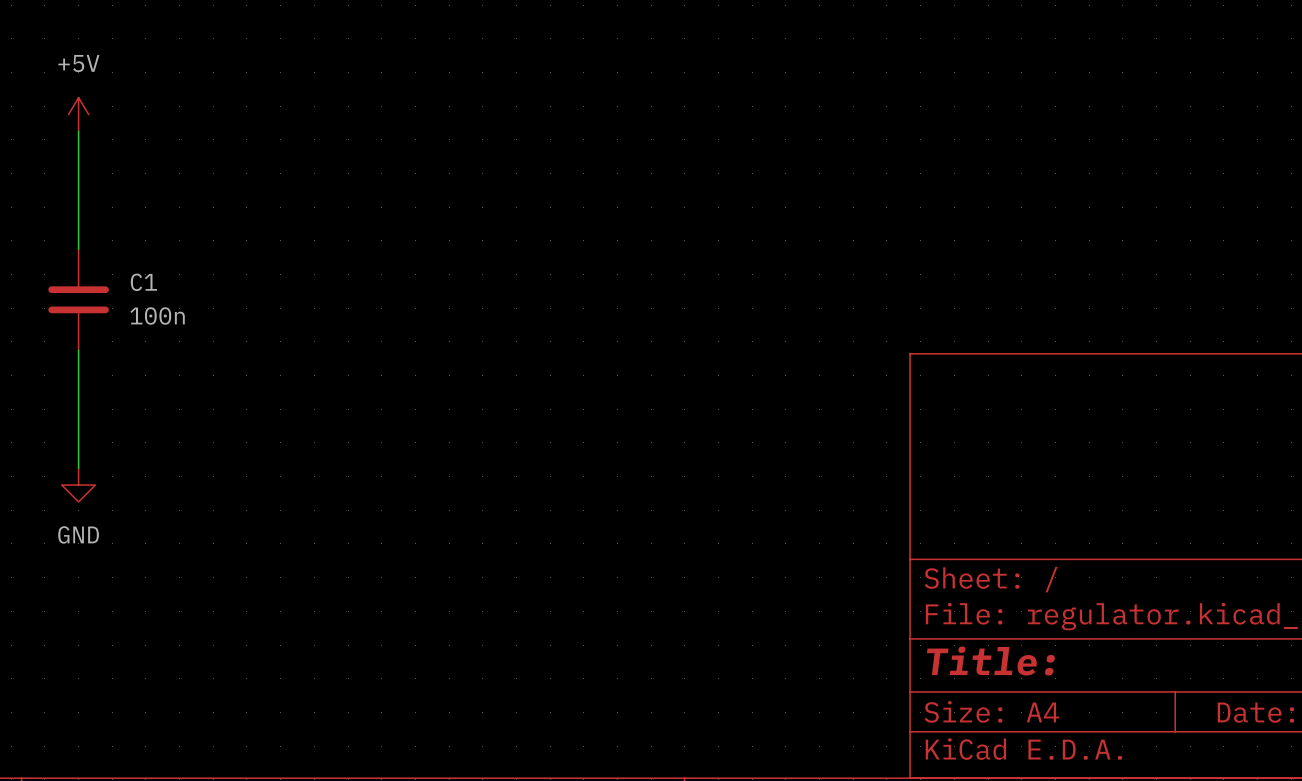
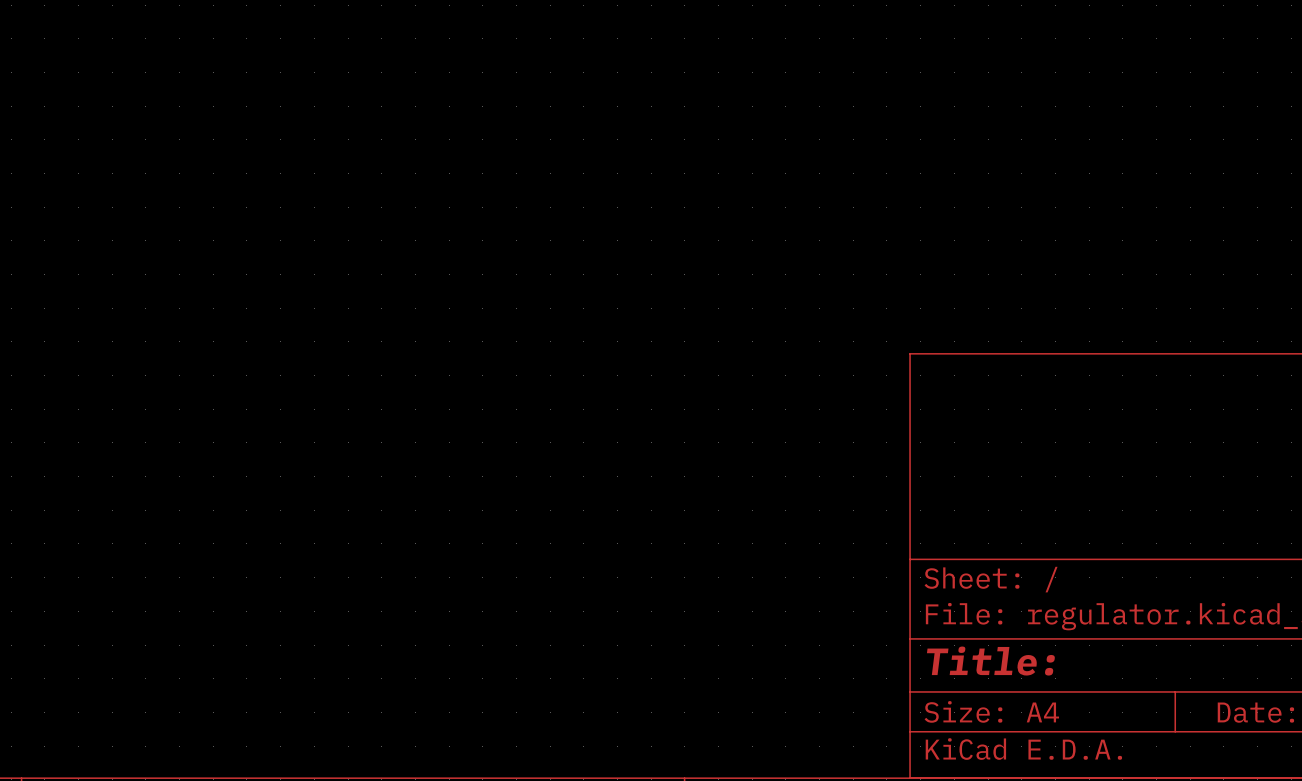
power symbol: +5V (78, 114) -> none
wire: (78, 131) (78, 249) -> none
C1: 100n (78, 299) -> none
wire: (78, 350) (78, 468) -> none
power symbol: GND (78, 485) -> none

